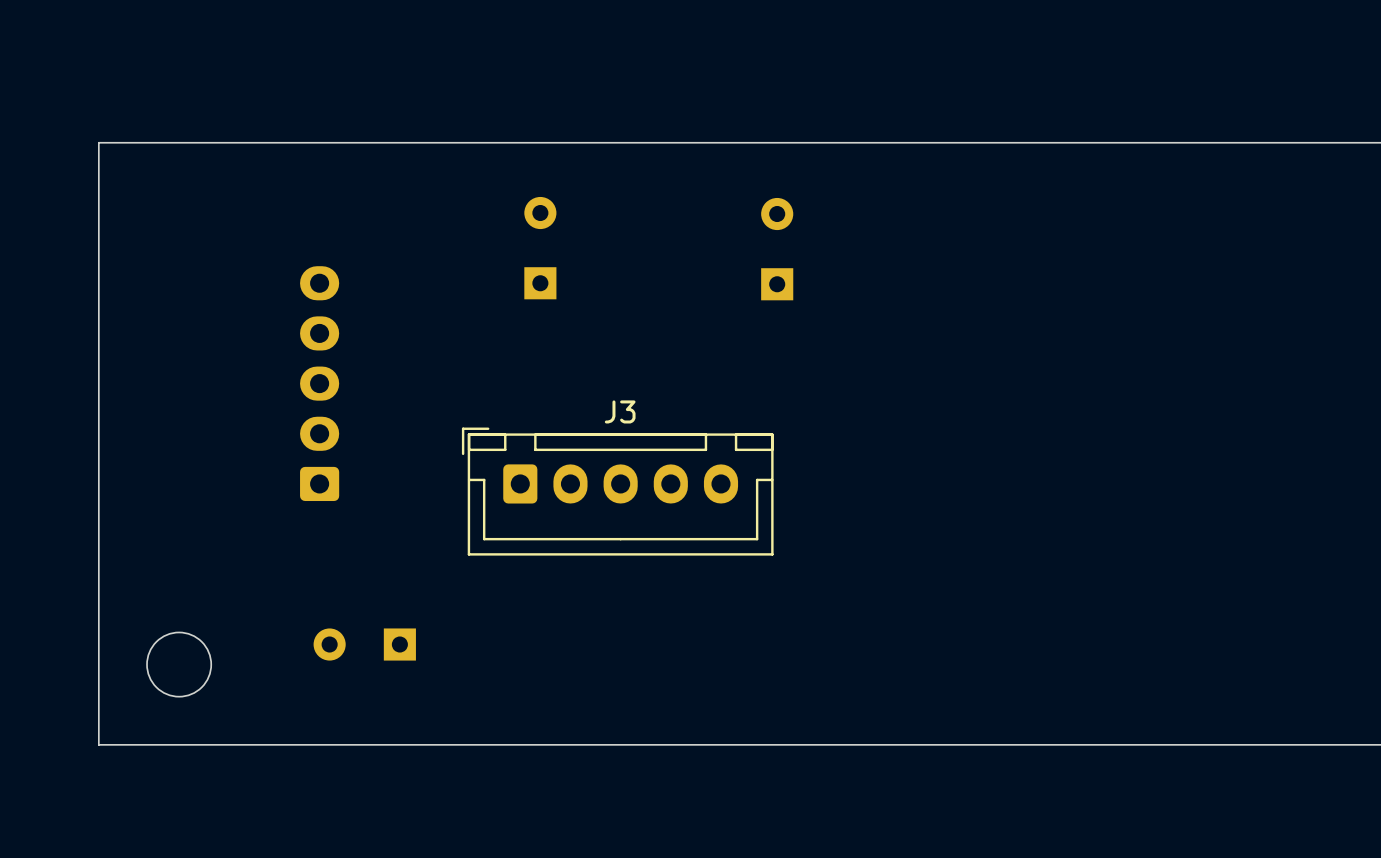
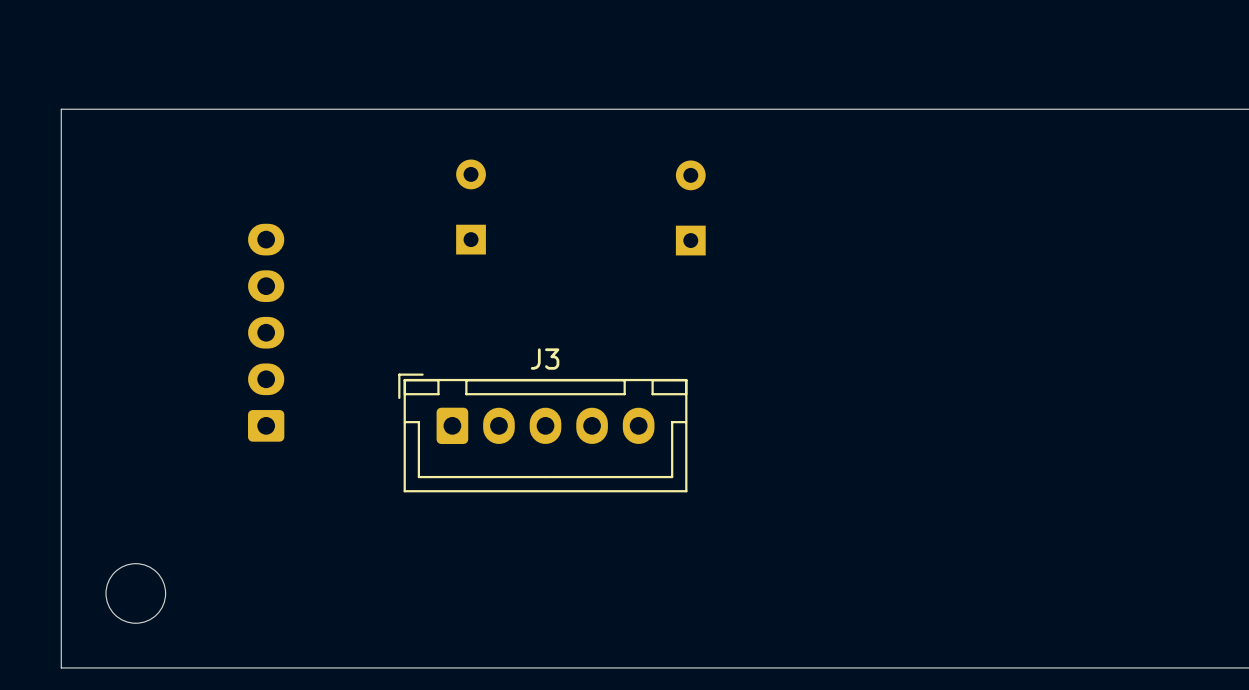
part: (364, 644) -> none

